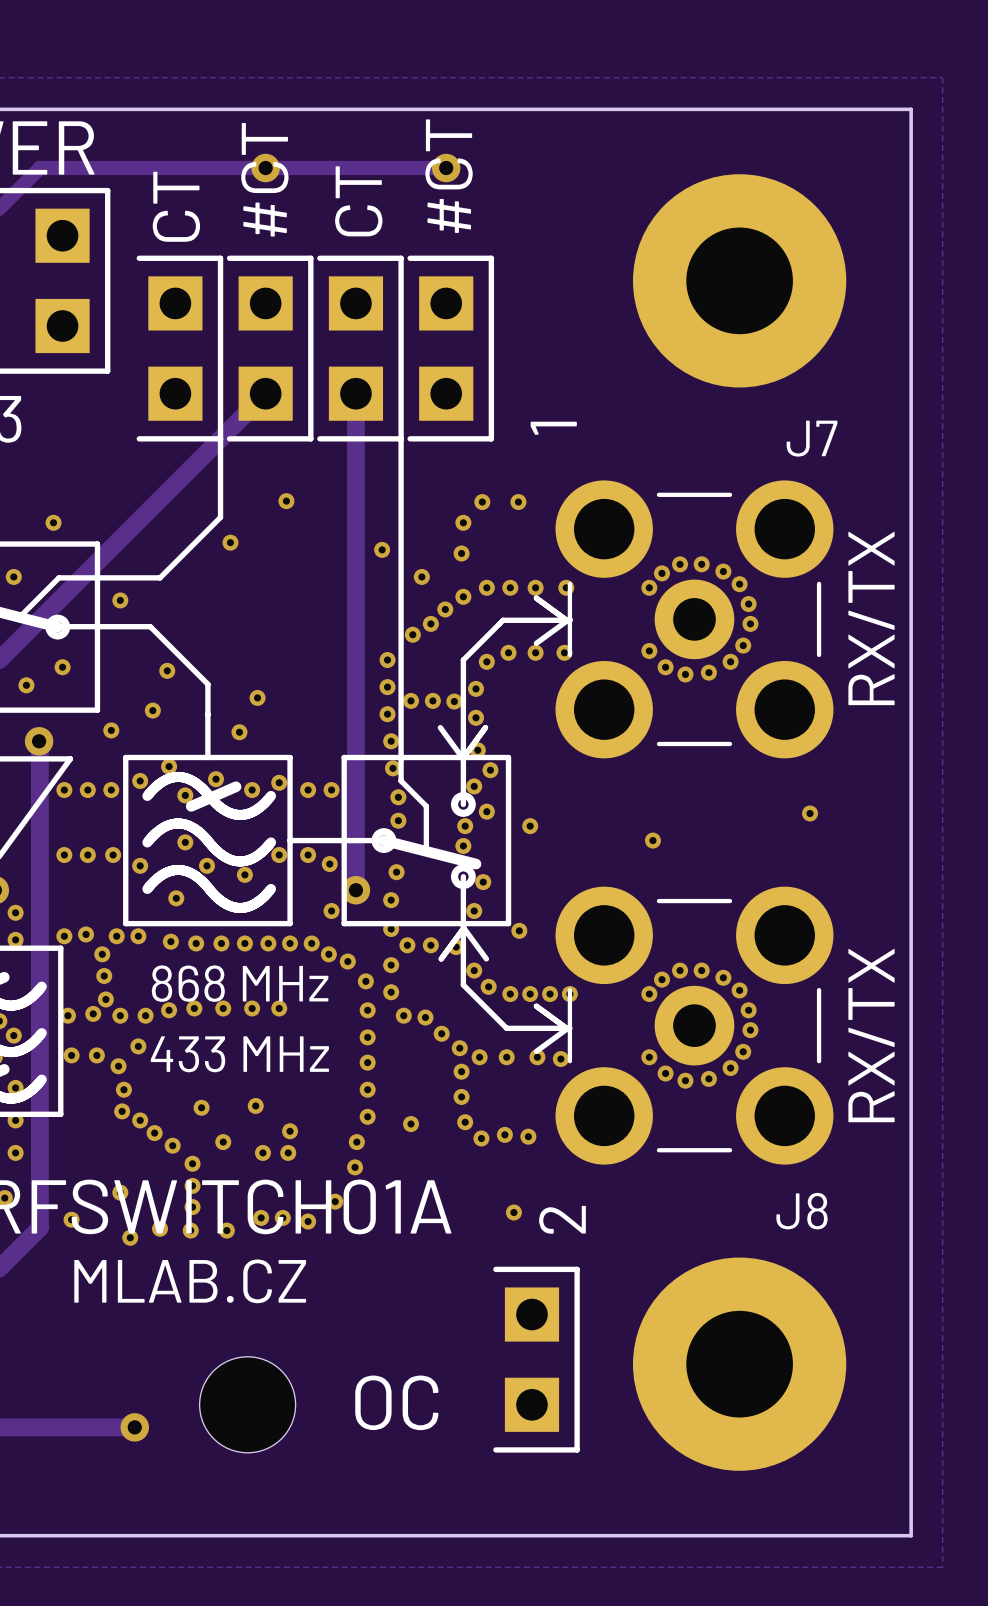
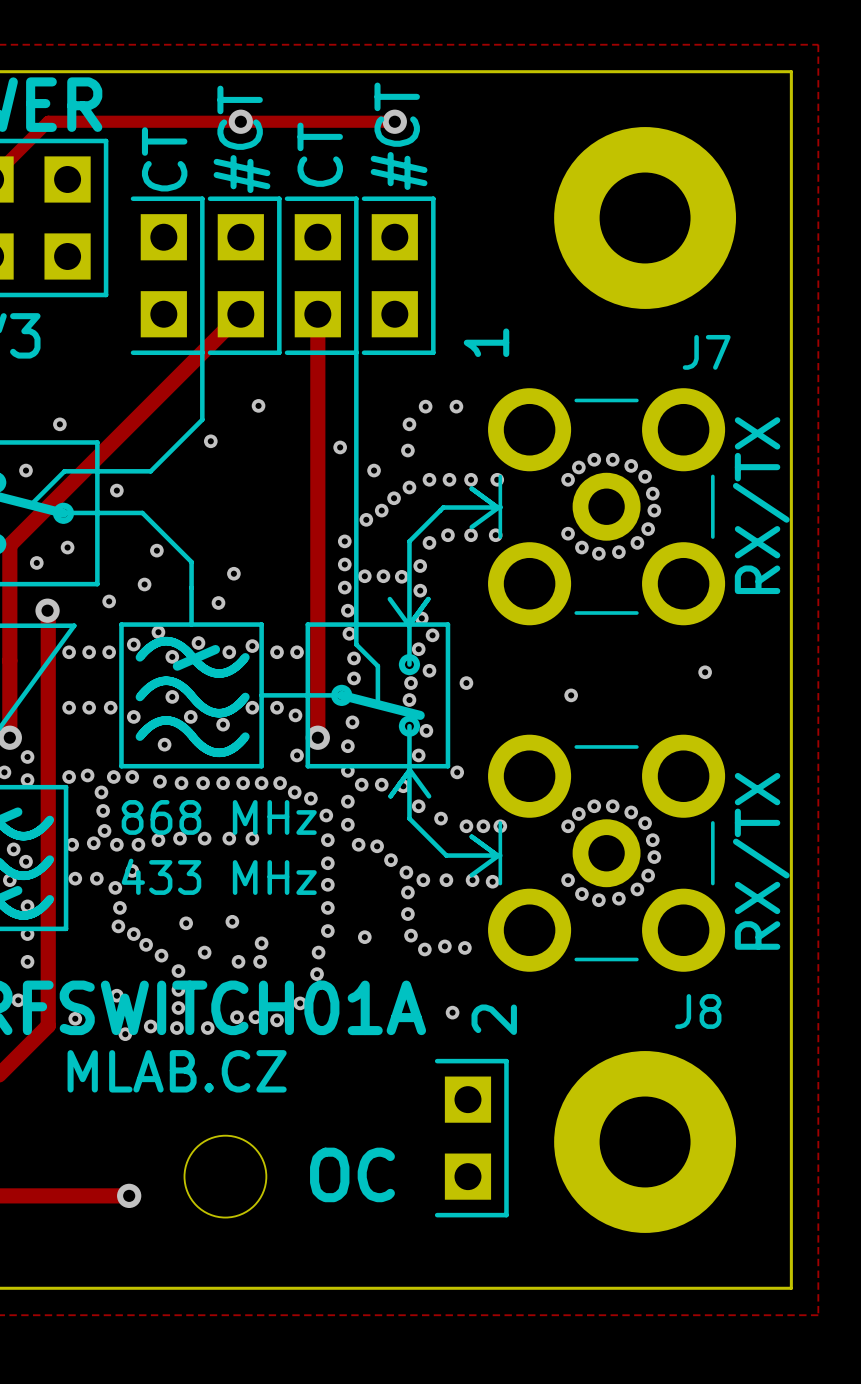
via: none -> (441, 818)
via: (488, 986) -> none
via: (510, 994) -> none

